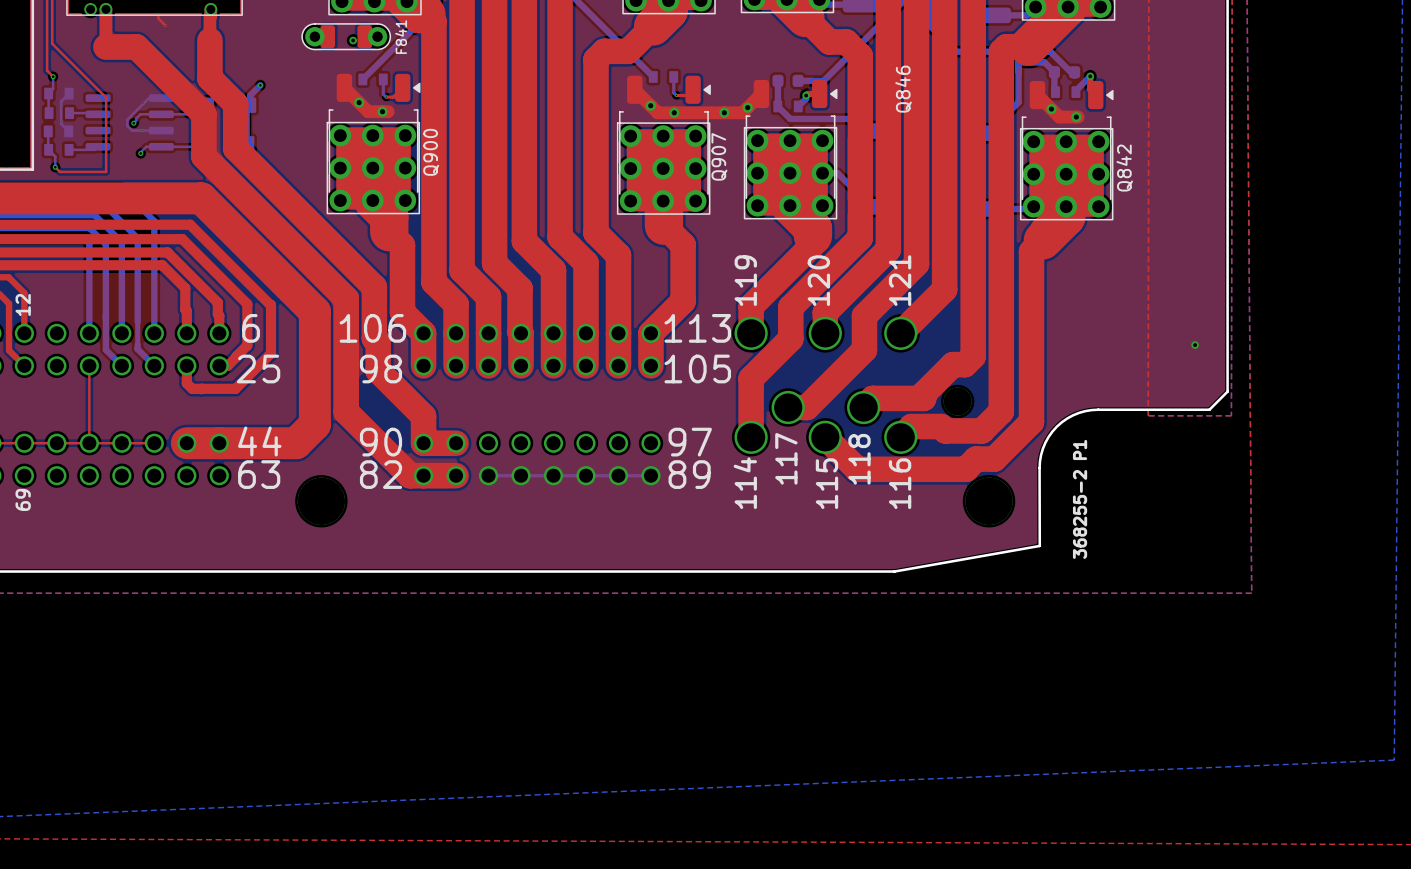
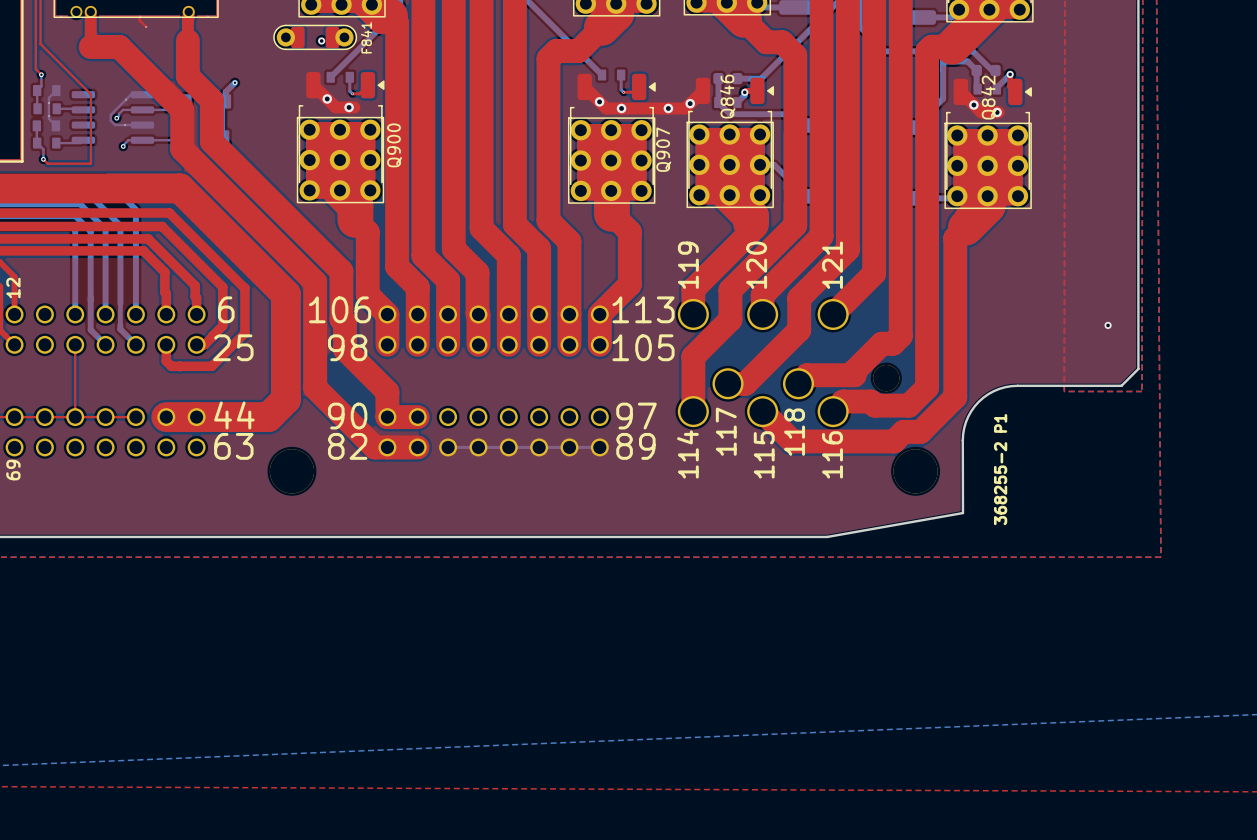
Q846 name position: Q846 (903, 89) -> Q846 (727, 96)
Q842 name position: Q842 (1124, 168) -> Q842 (988, 97)

